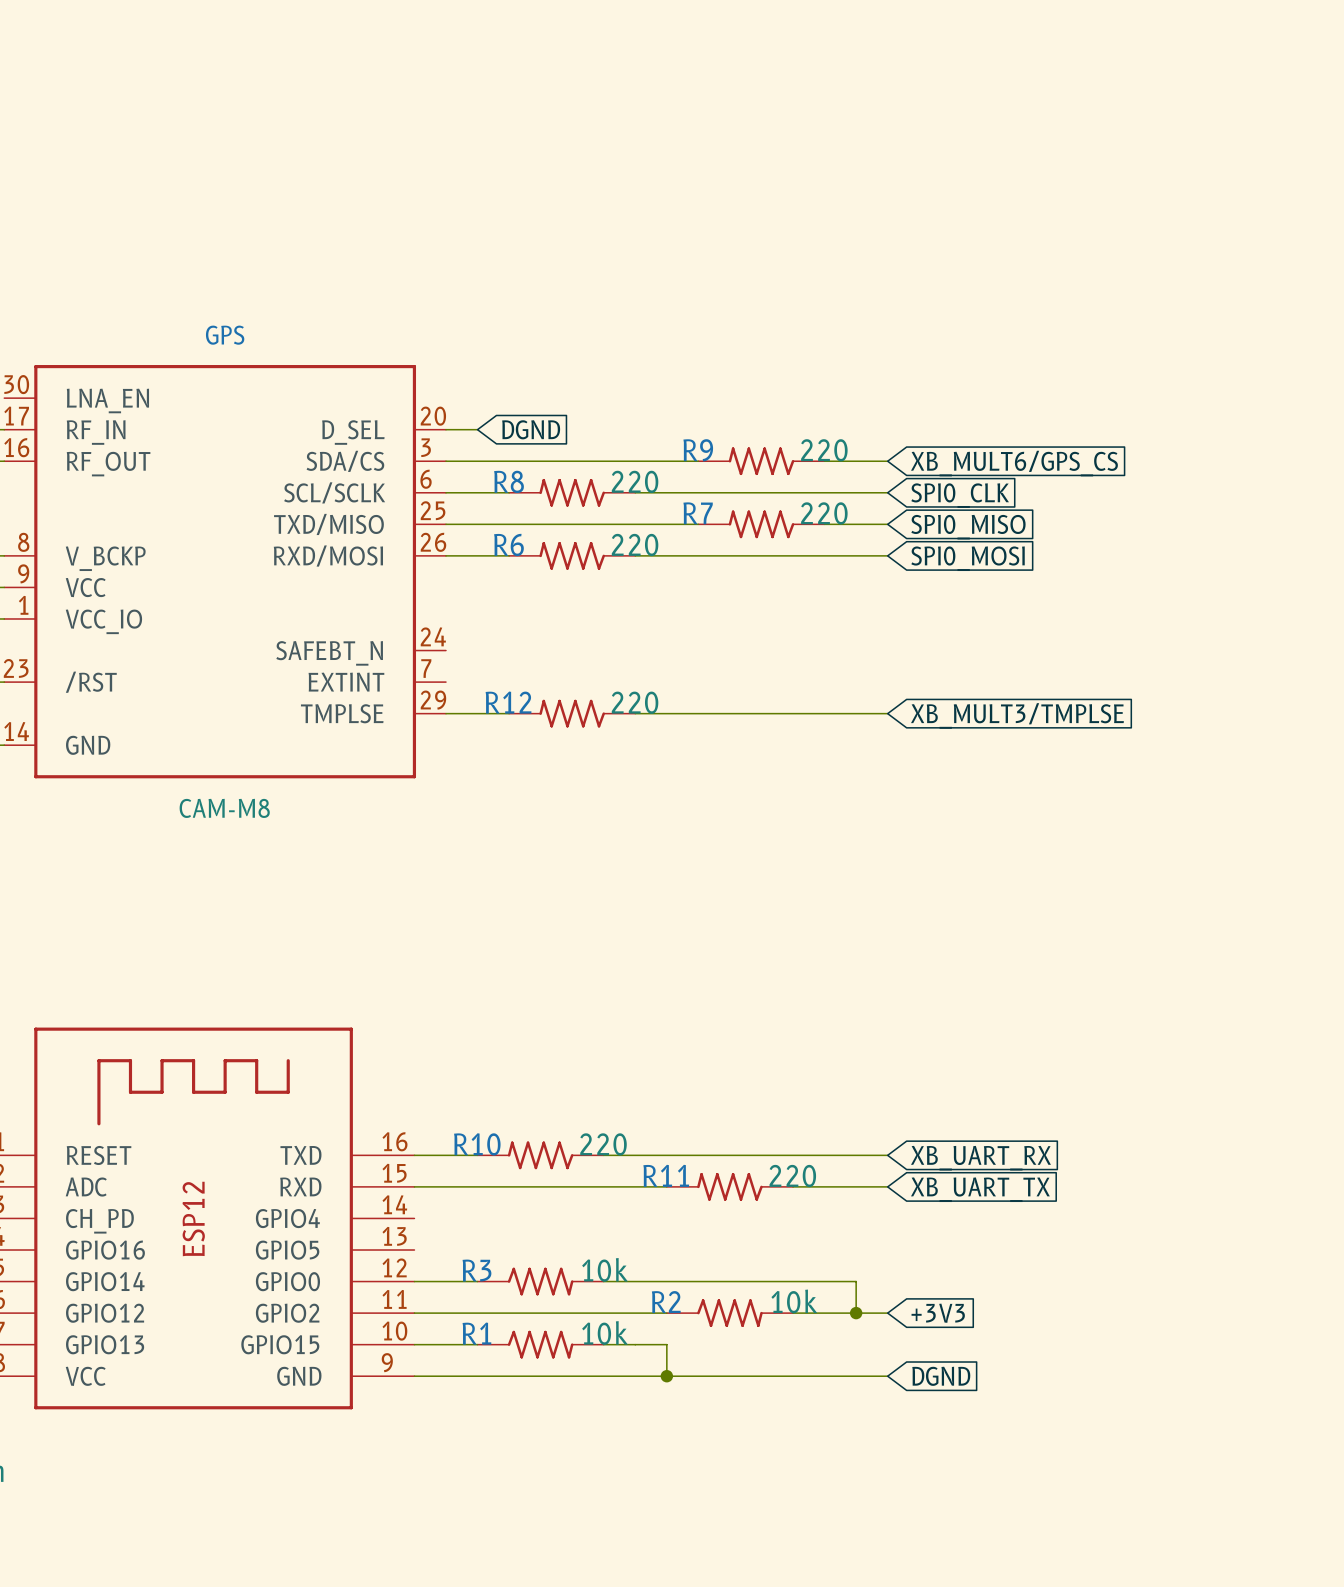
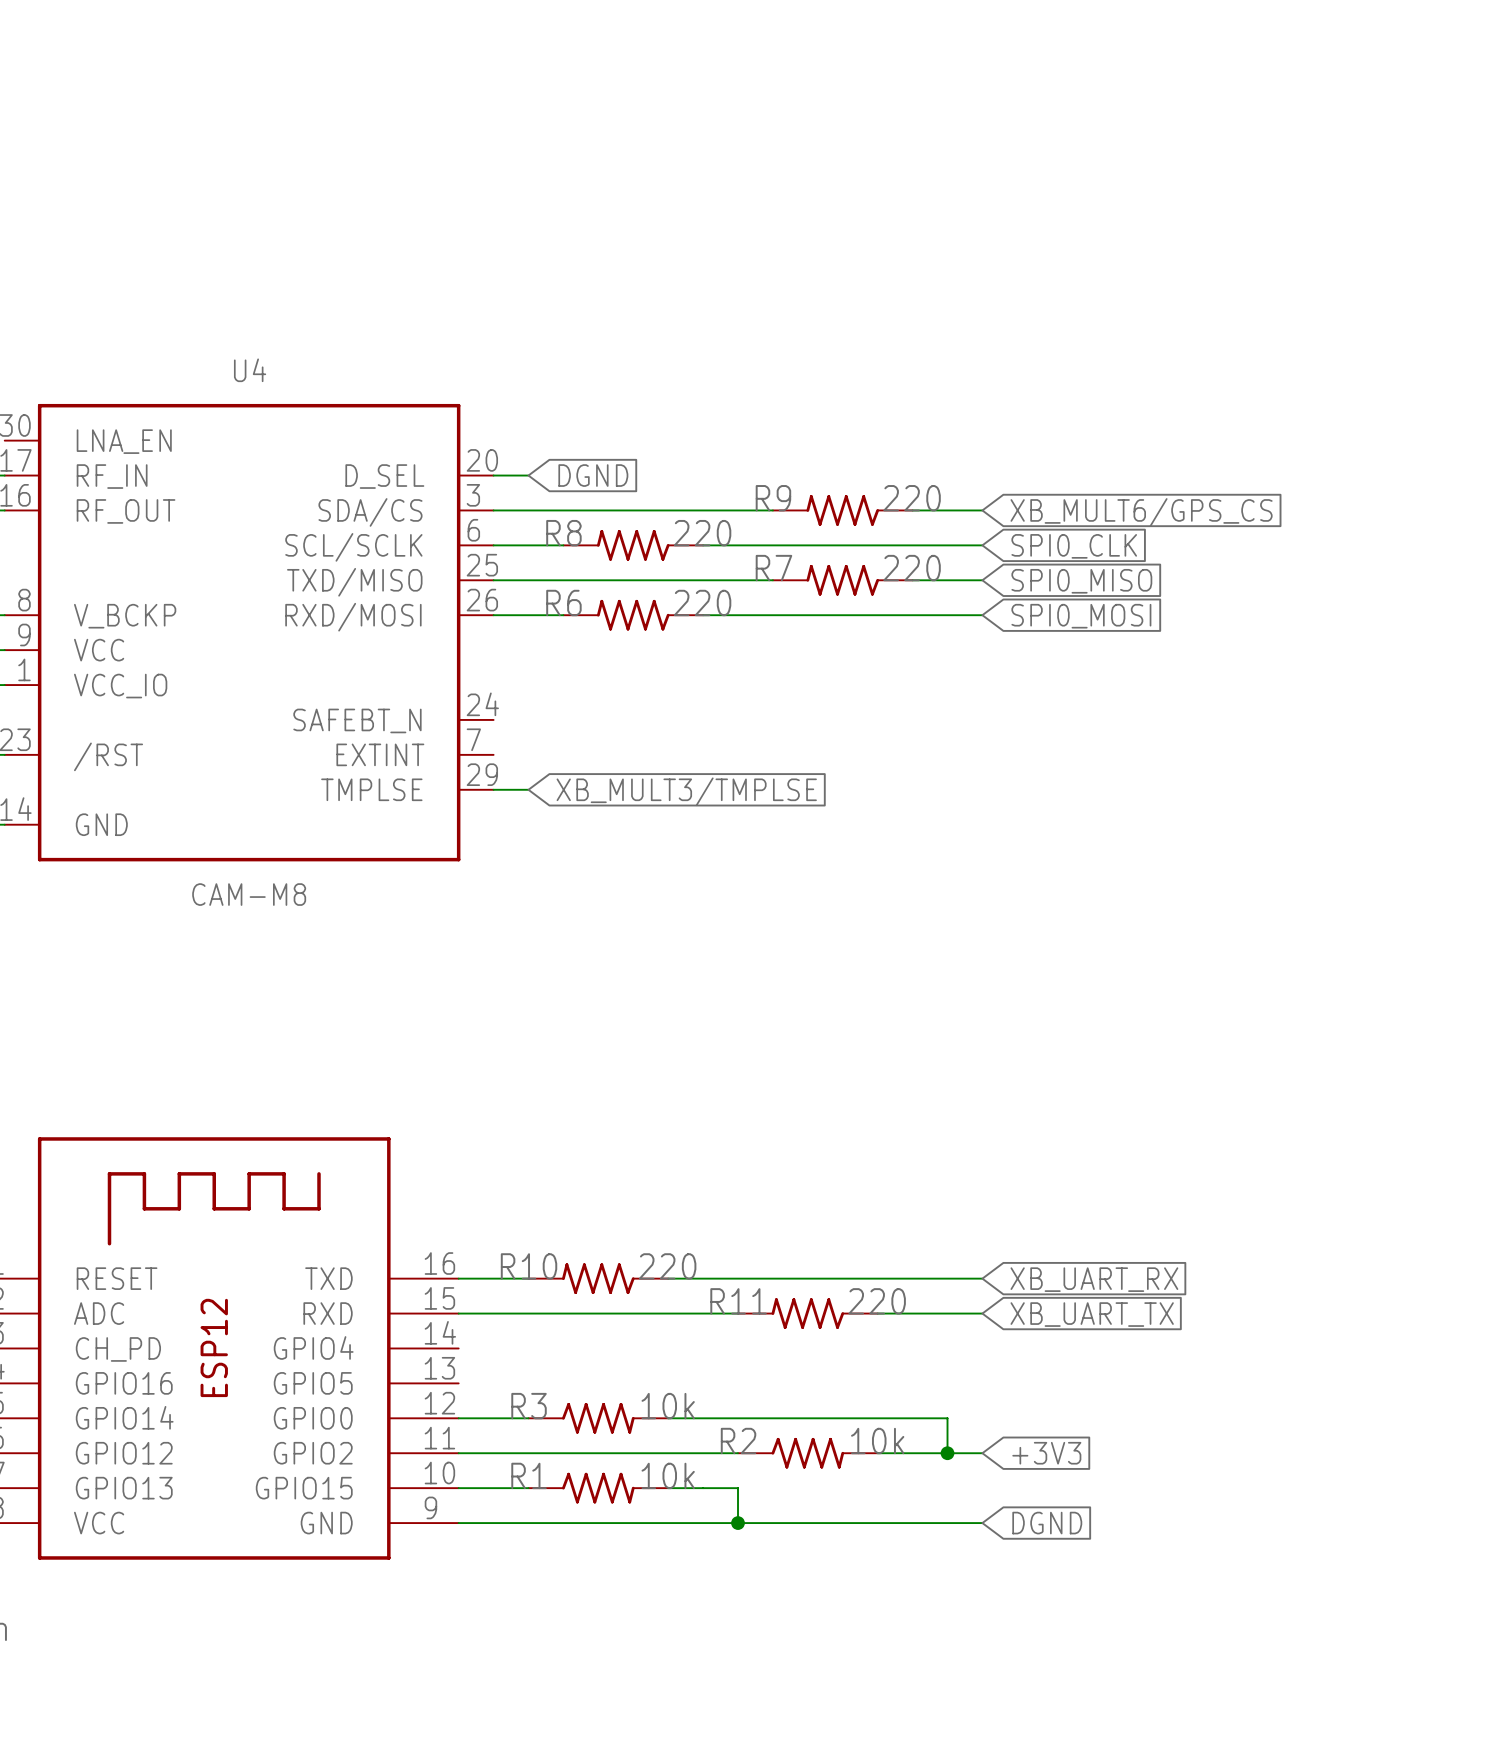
GPS name: GPS (225, 335) -> U4 (250, 370)
wire: (477, 713) (509, 713) -> none
R12: 220 (572, 713) -> none
wire: (635, 713) (887, 713) -> none
global label: none -> XB_MULT3/TMPLSE (686, 791)
global label: XB_MULT3/TMPLSE (1017, 715) -> none

